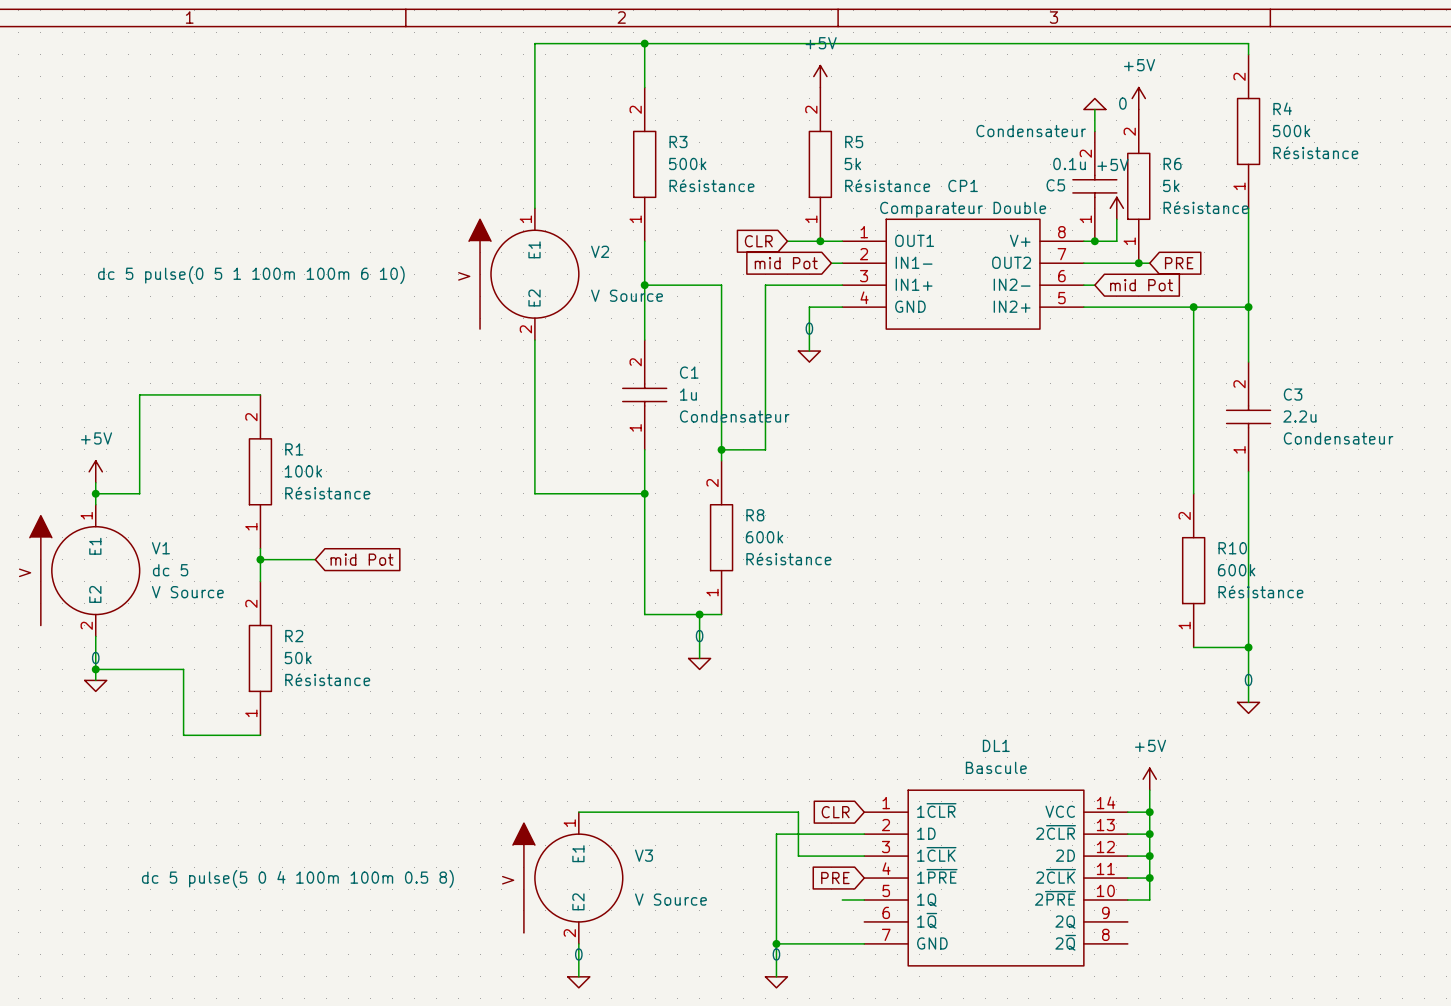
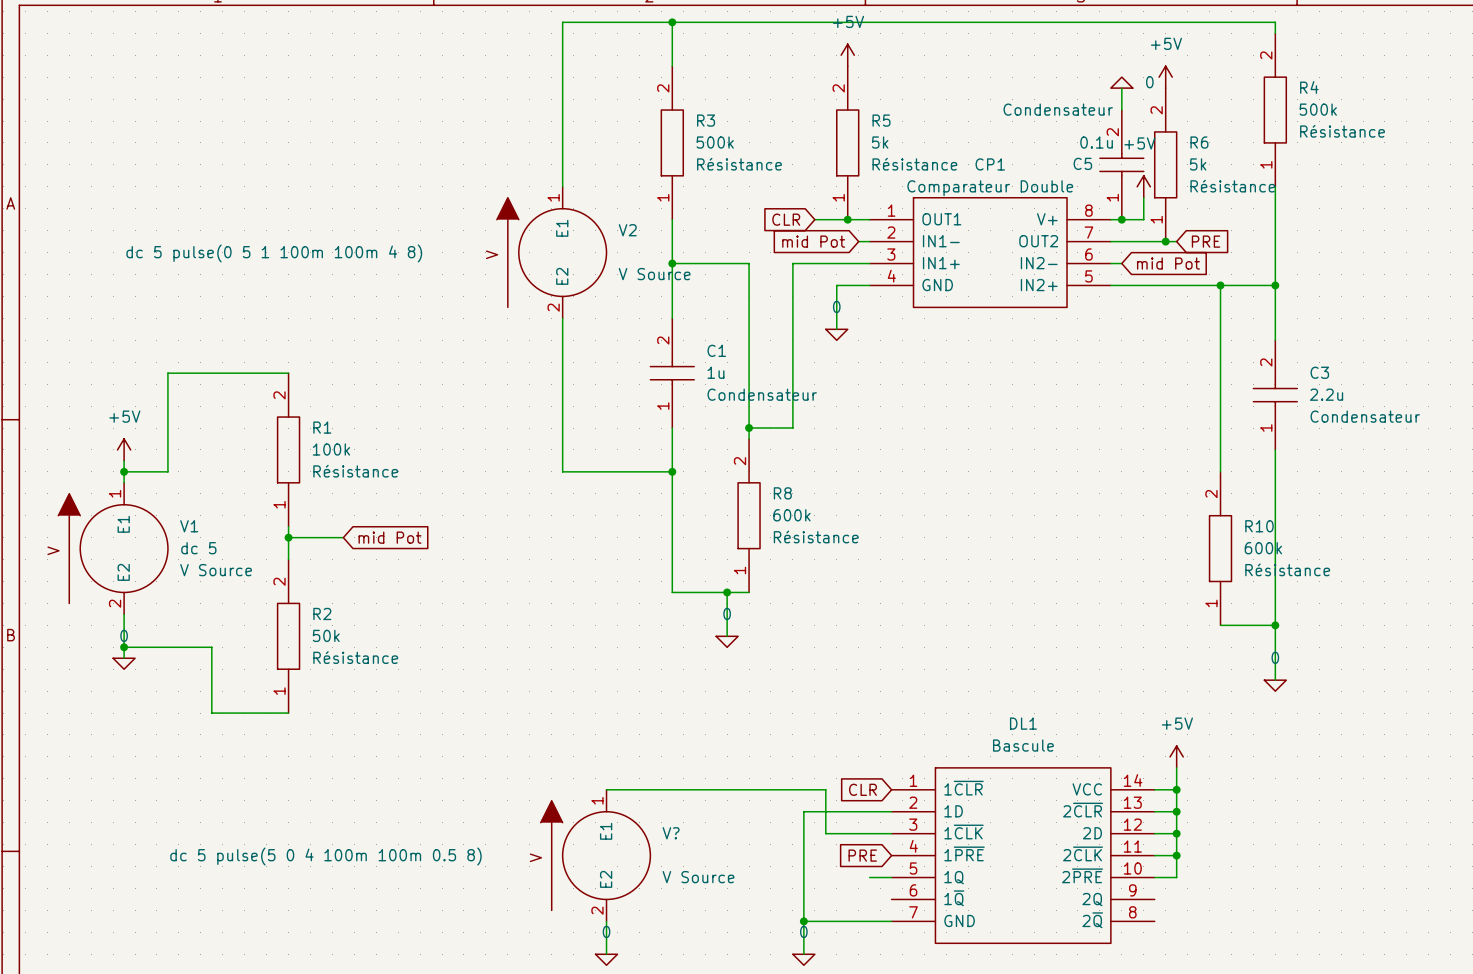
V2 text: dc 5 pulse(0 5 1 100m 100m 6 10) (251, 275) -> dc 5 pulse(0 5 1 100m 100m 4 8) (274, 253)
V3 name: V3 (644, 855) -> V? (671, 833)

